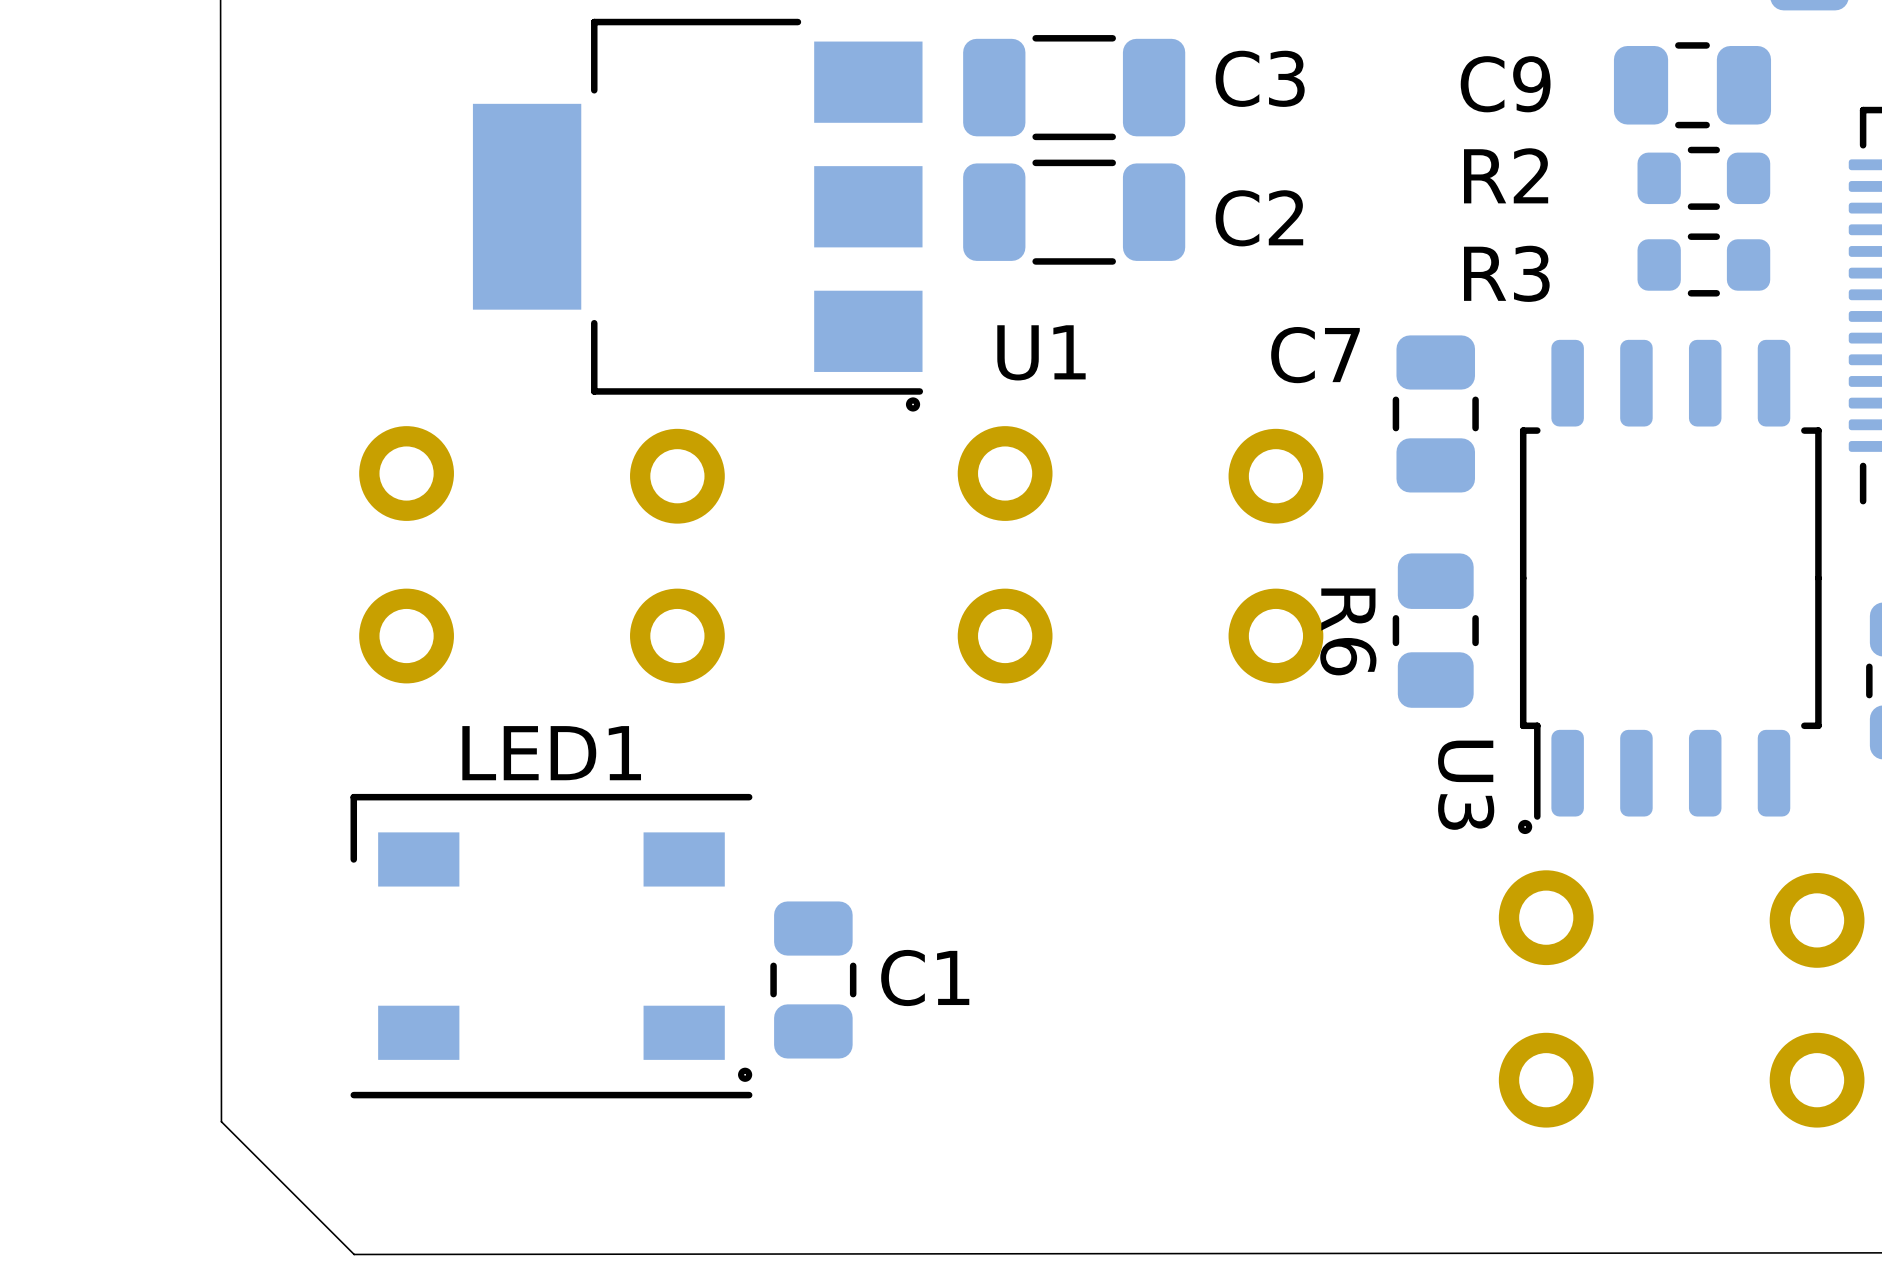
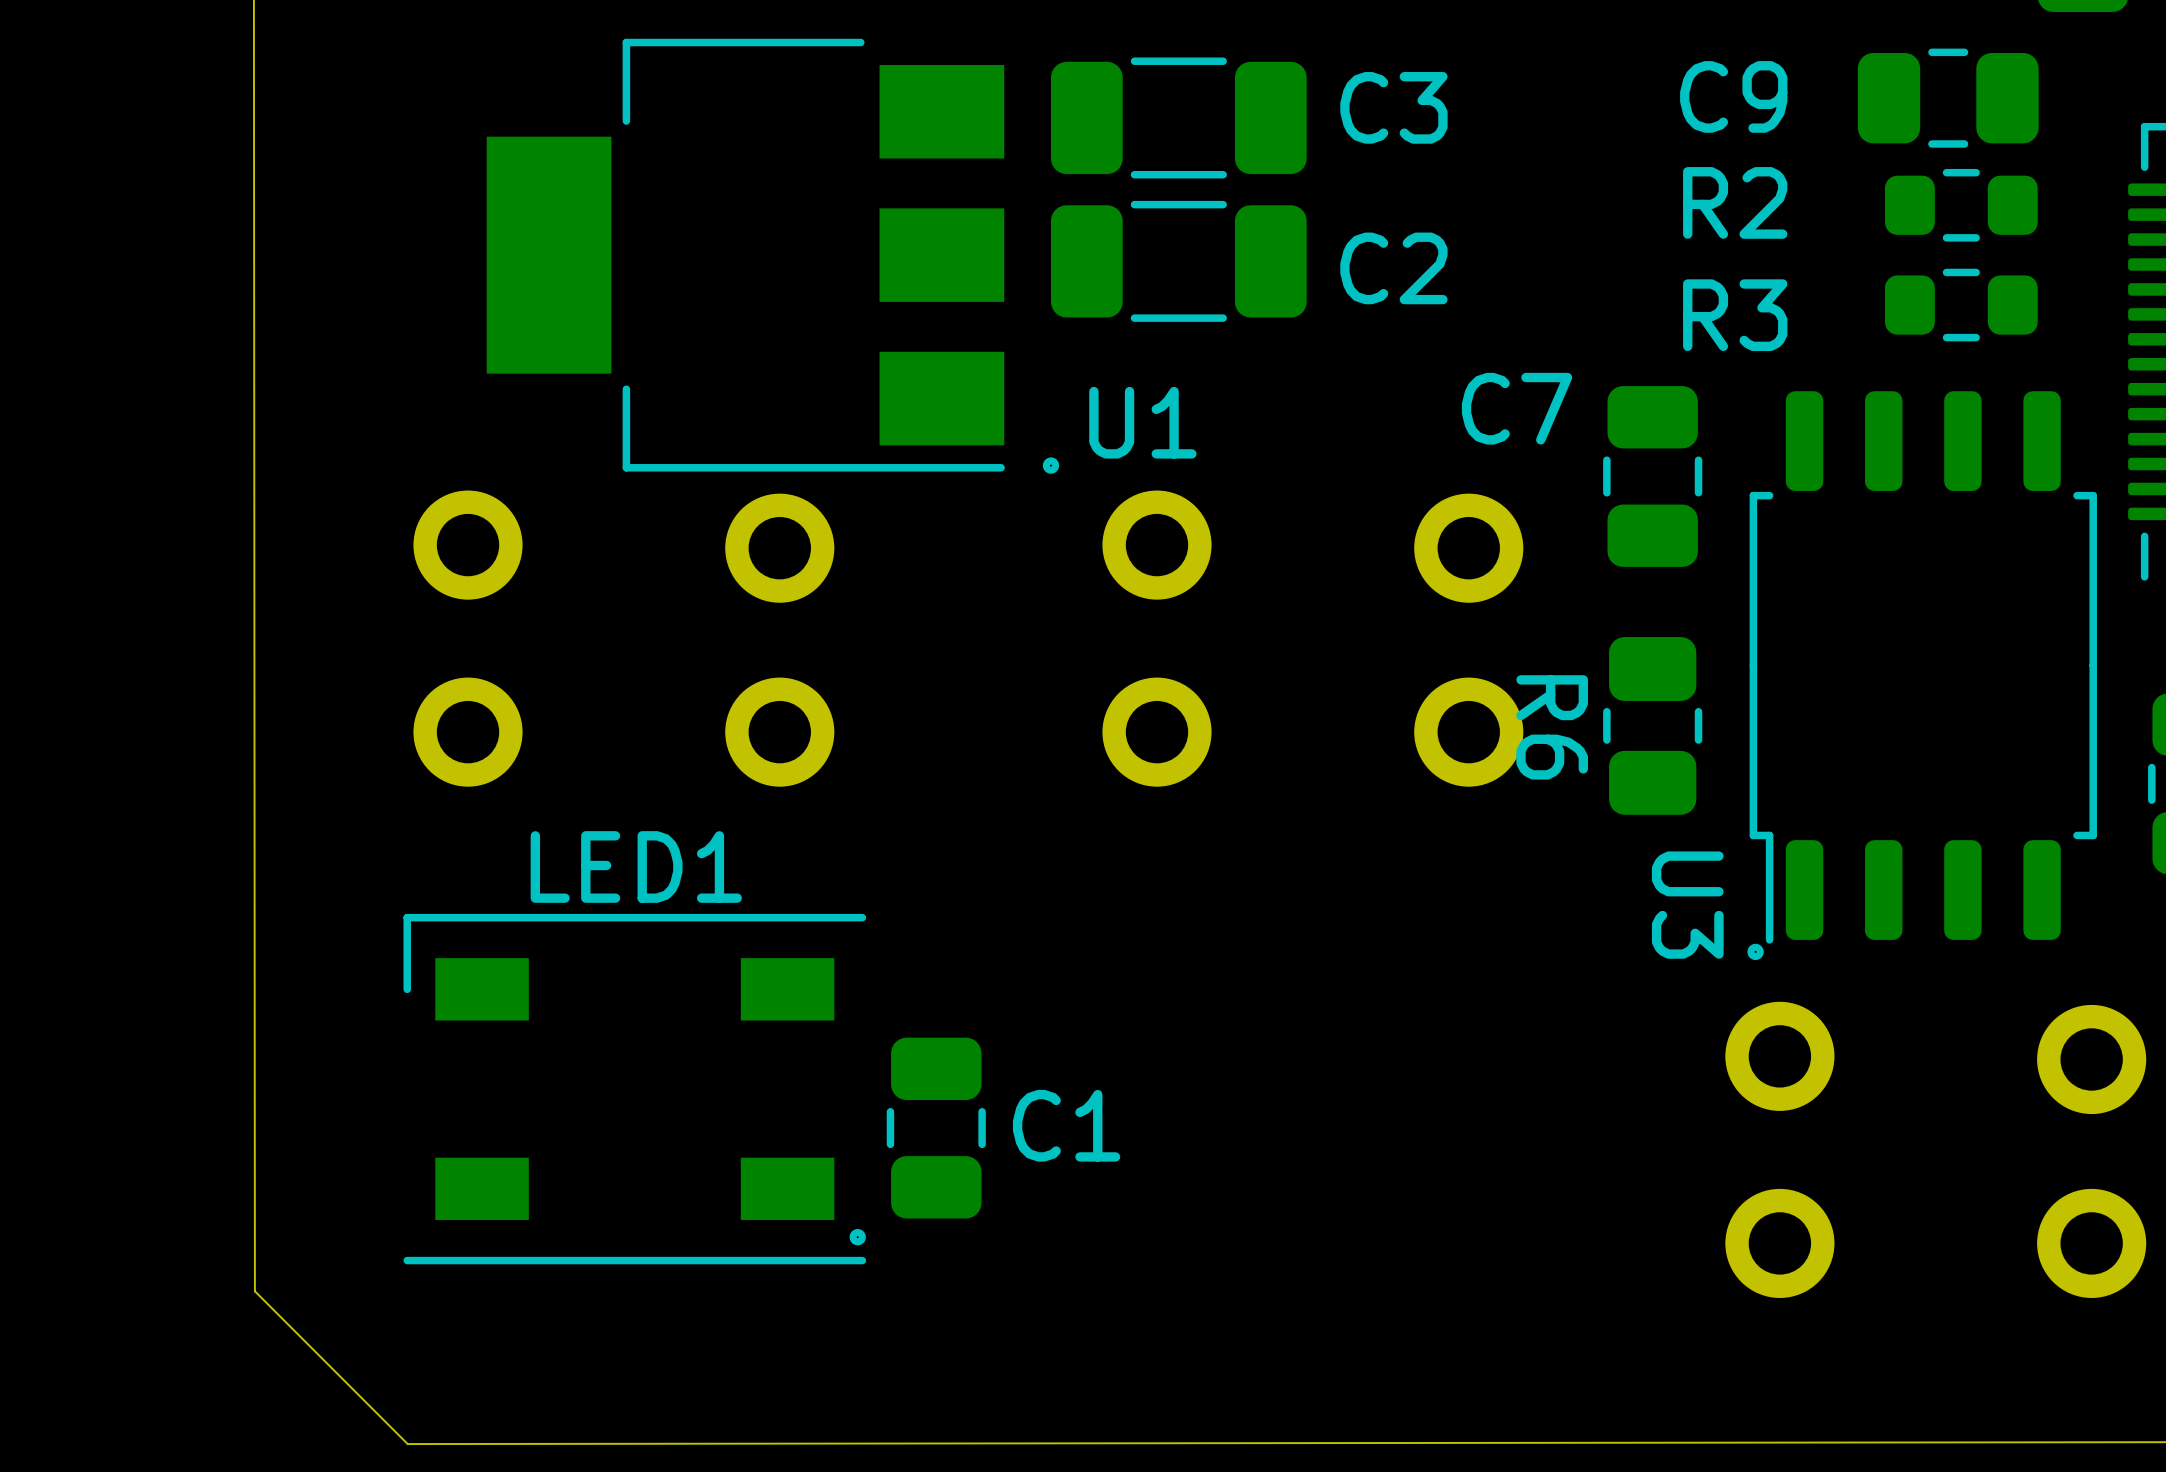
C2 position: (1074, 87) -> (1178, 117)
U1 position: (697, 206) -> (745, 255)
C3 position: (1074, 212) -> (1178, 261)

